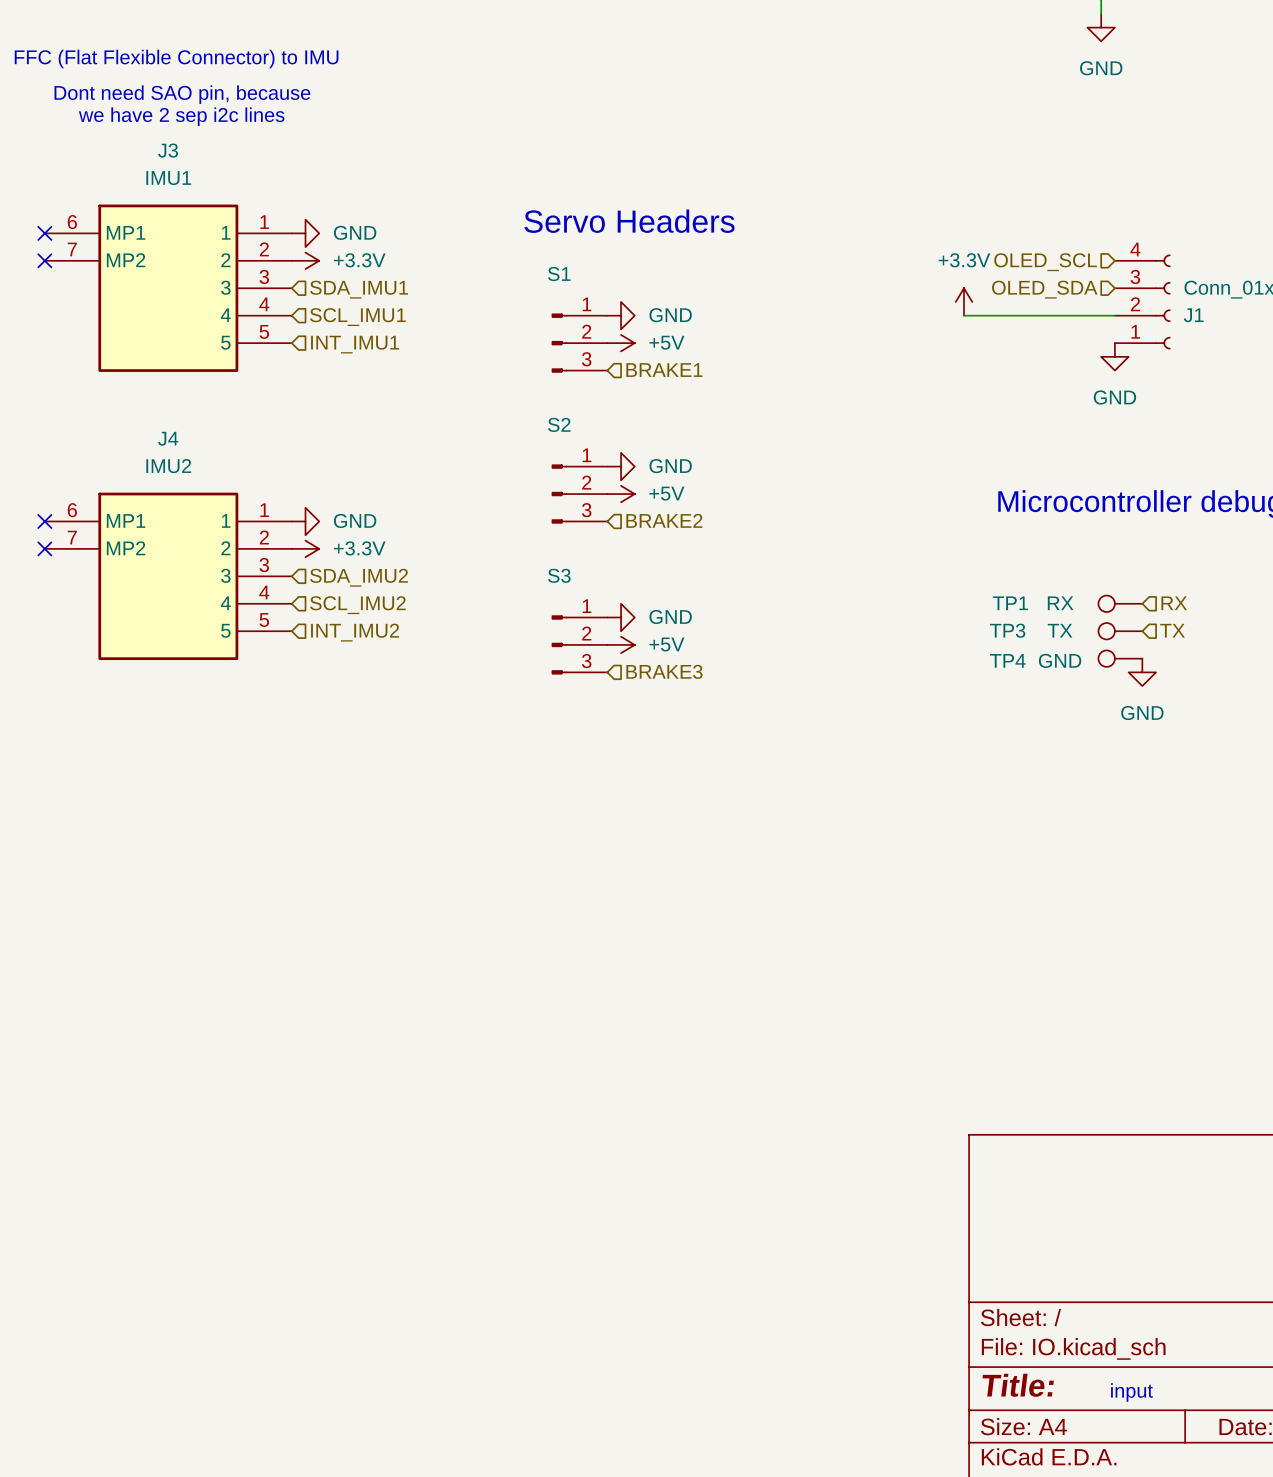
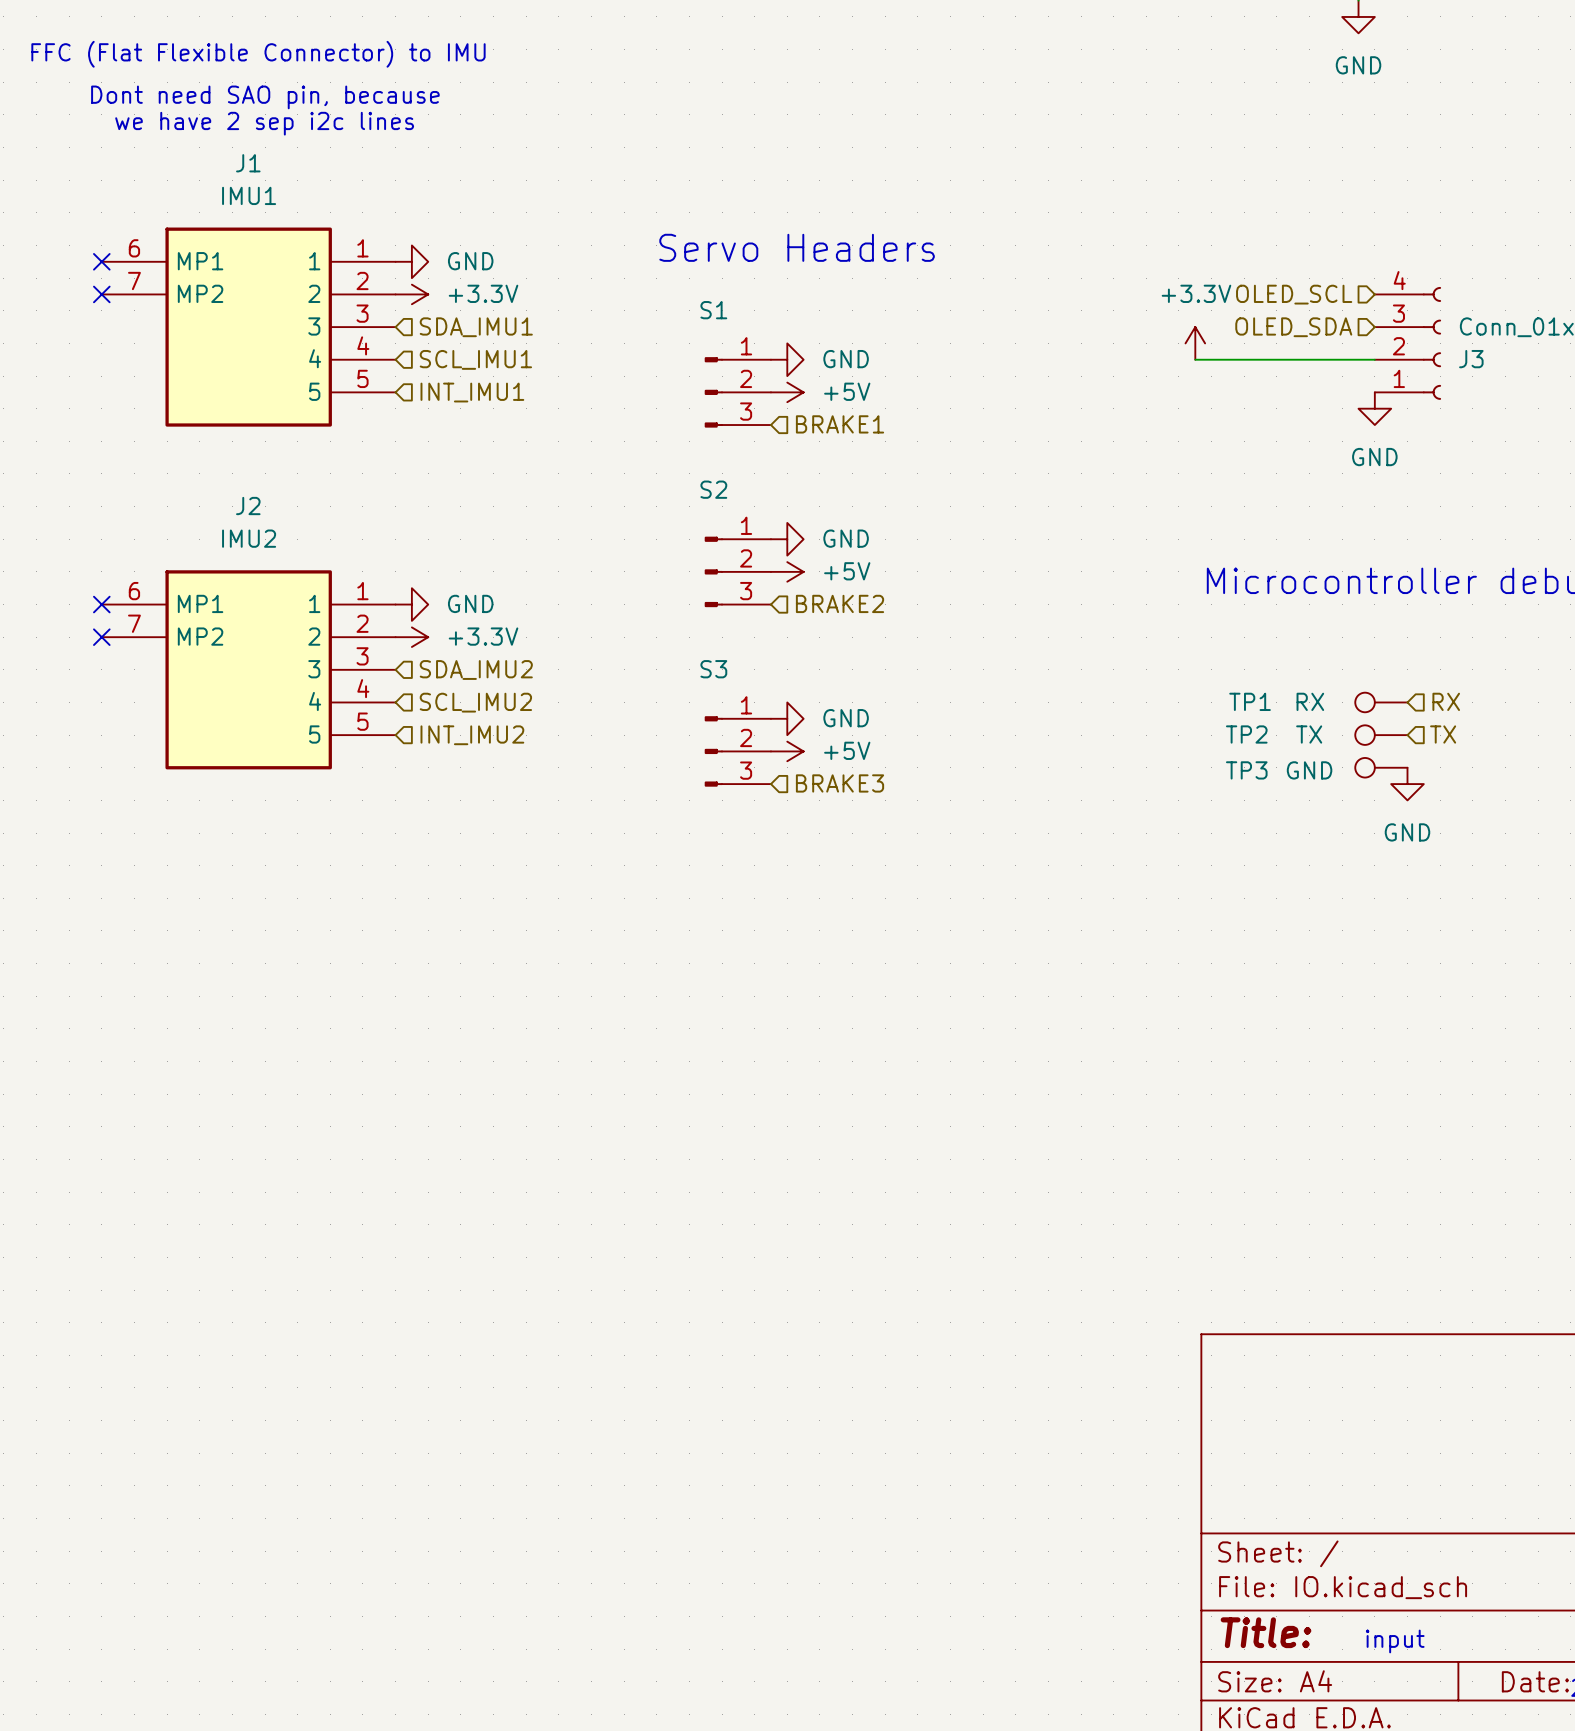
J3 name: J3 (168, 150) -> J1 (248, 163)
J1 name: J1 (1193, 315) -> J3 (1471, 359)
J4 name: J4 (168, 438) -> J2 (248, 506)
TP3 name: TP3 (1007, 630) -> TP2 (1246, 734)
TP4 name: TP4 (1007, 660) -> TP3 (1246, 770)

